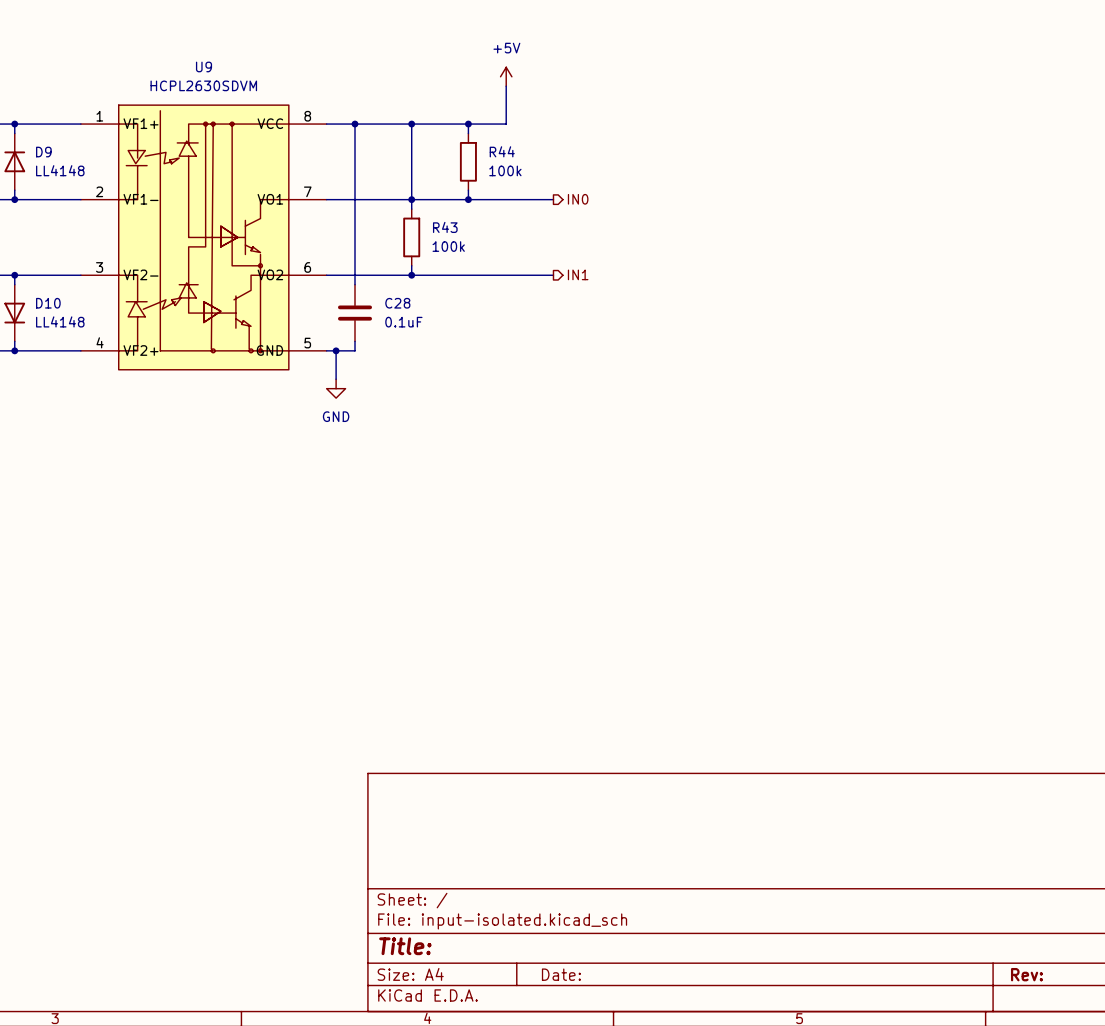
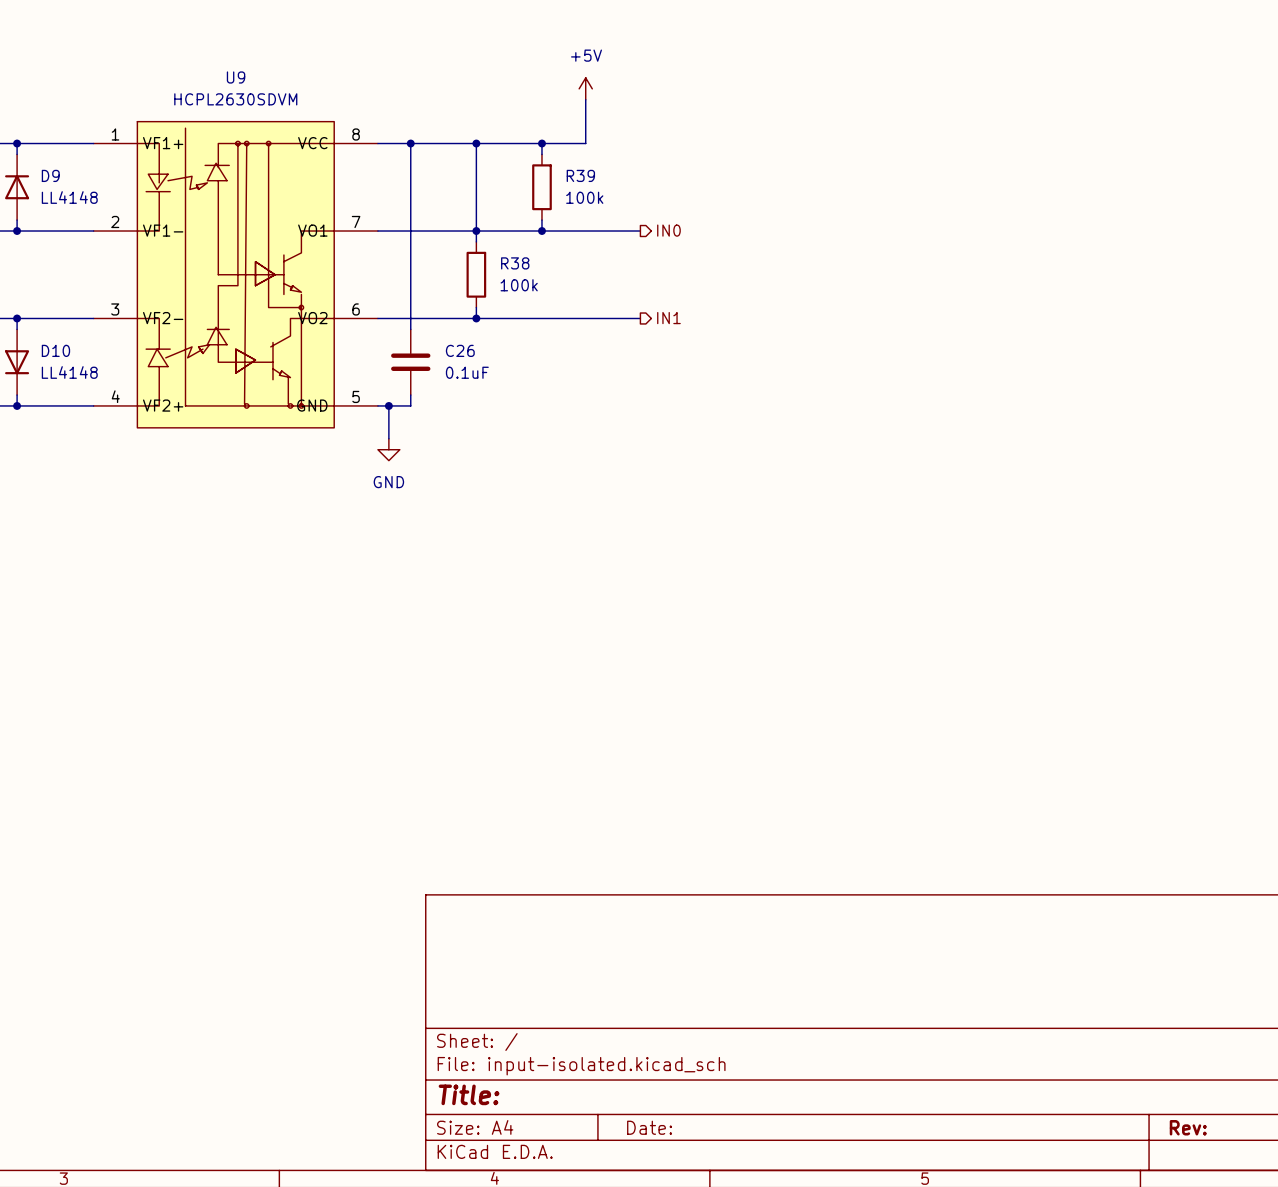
R44 name: R44 (502, 151) -> R39 (580, 175)
R43 name: R43 (445, 227) -> R38 (515, 263)
C28 name: C28 (397, 303) -> C26 (460, 350)

